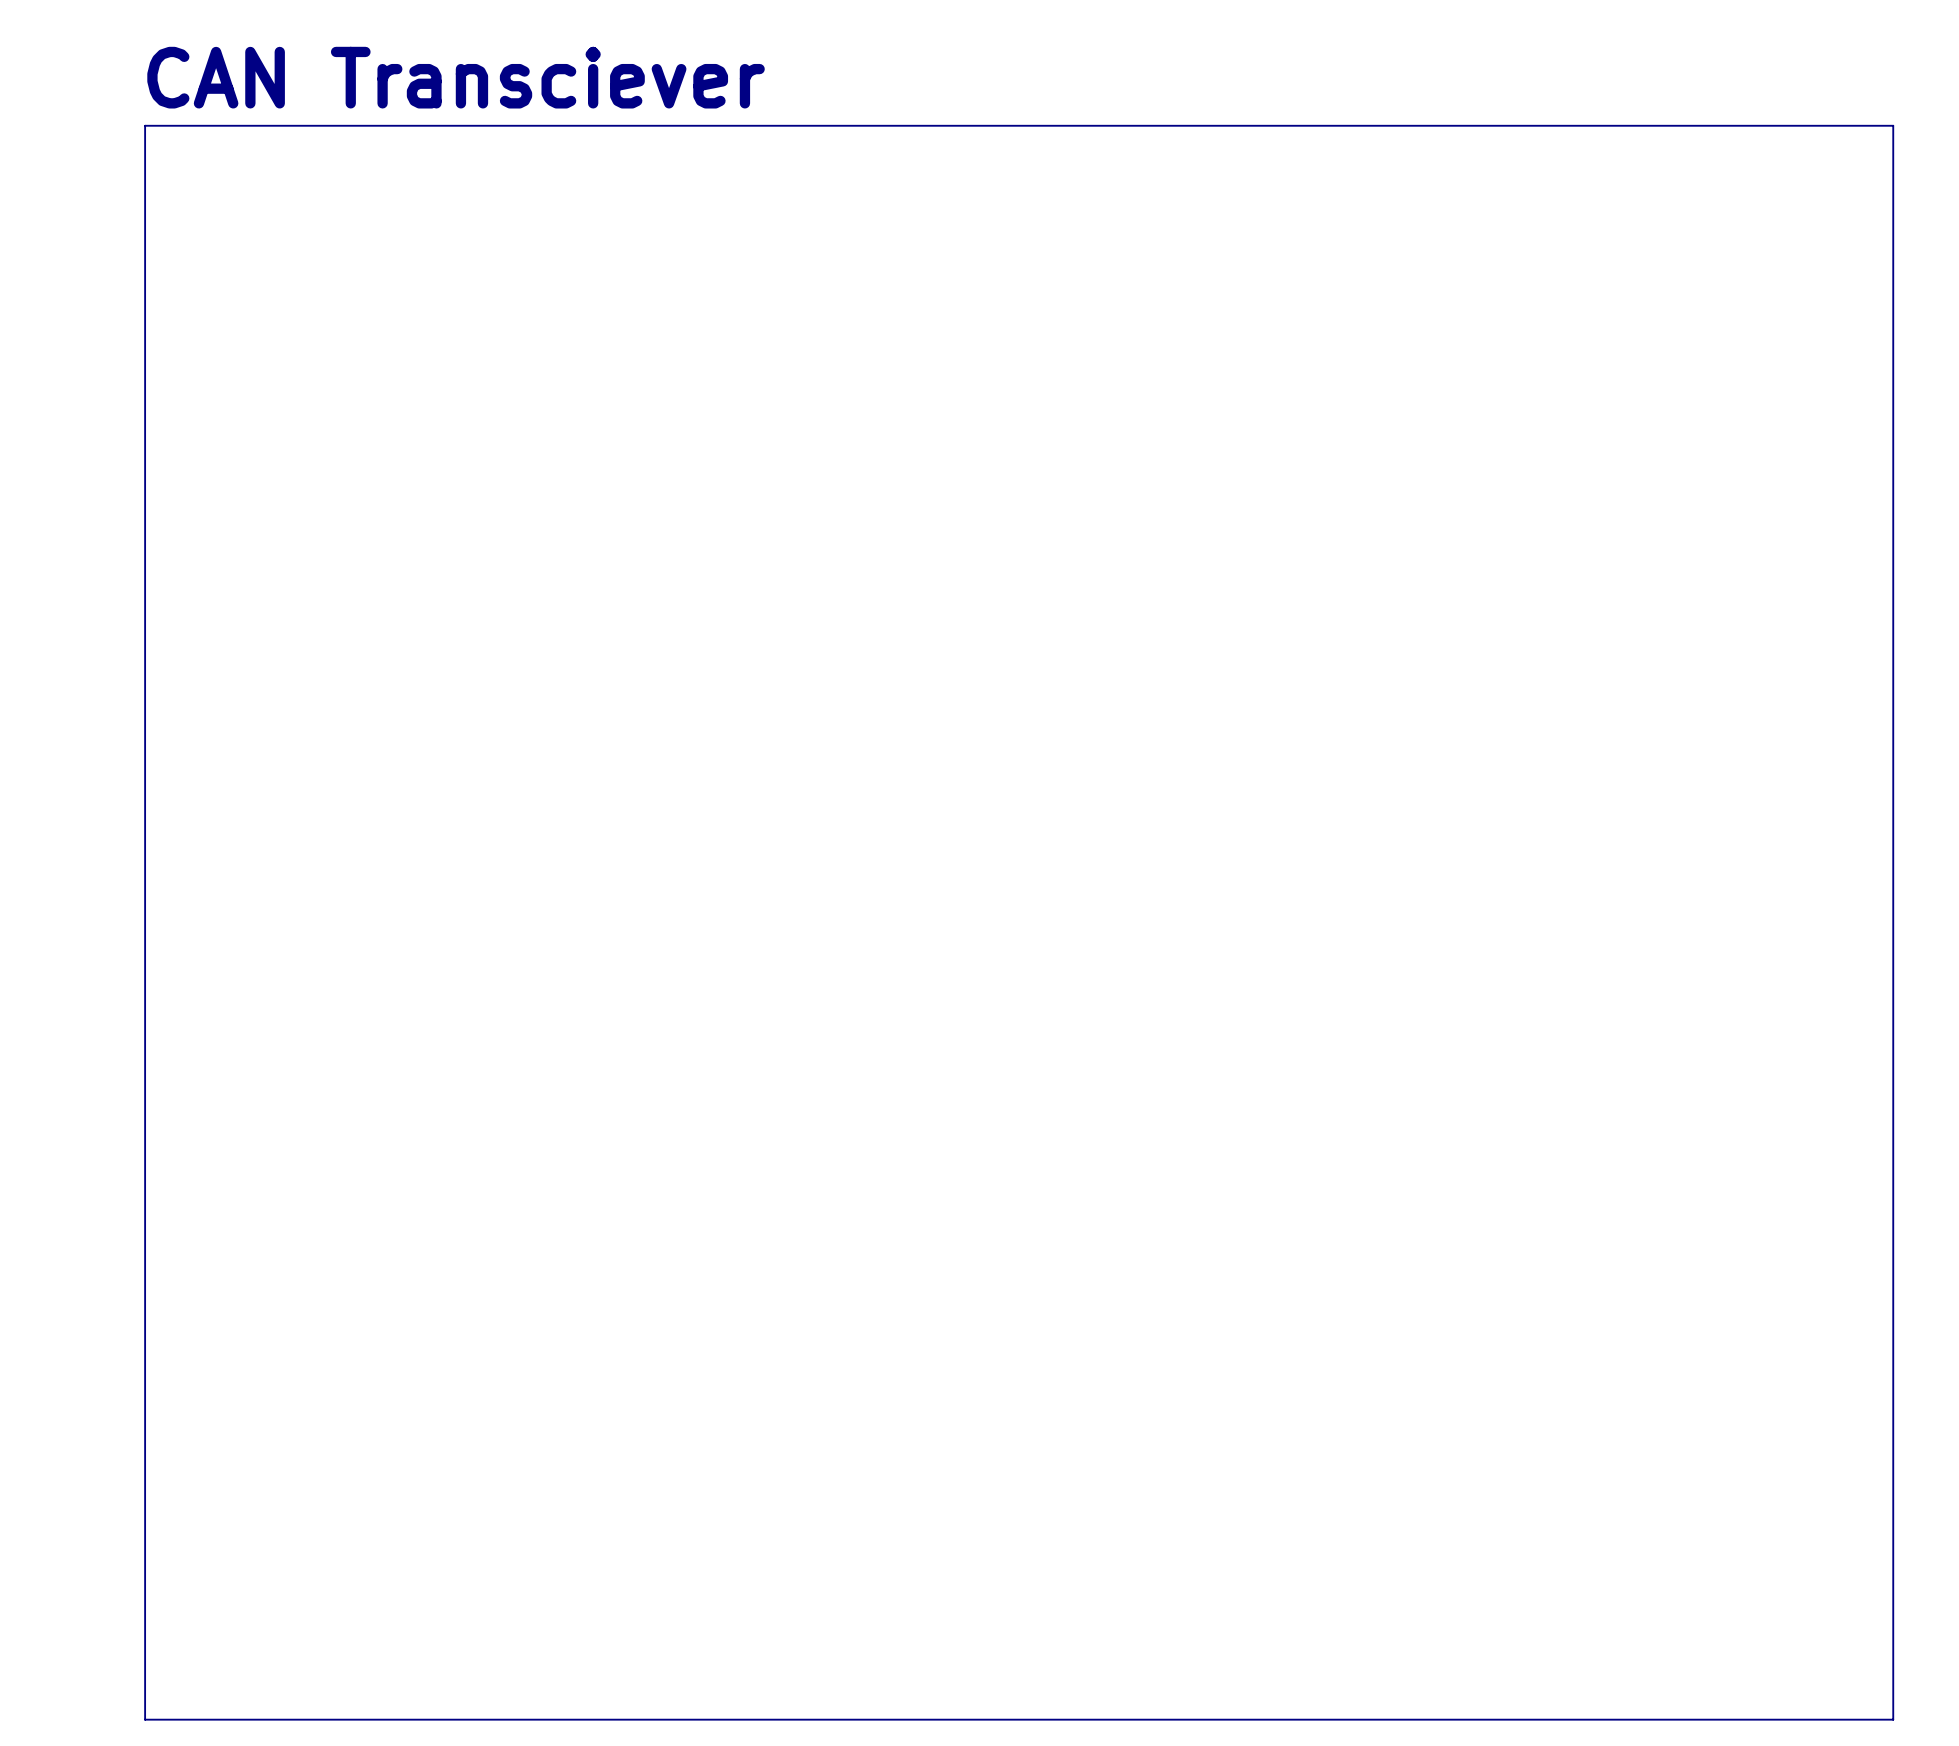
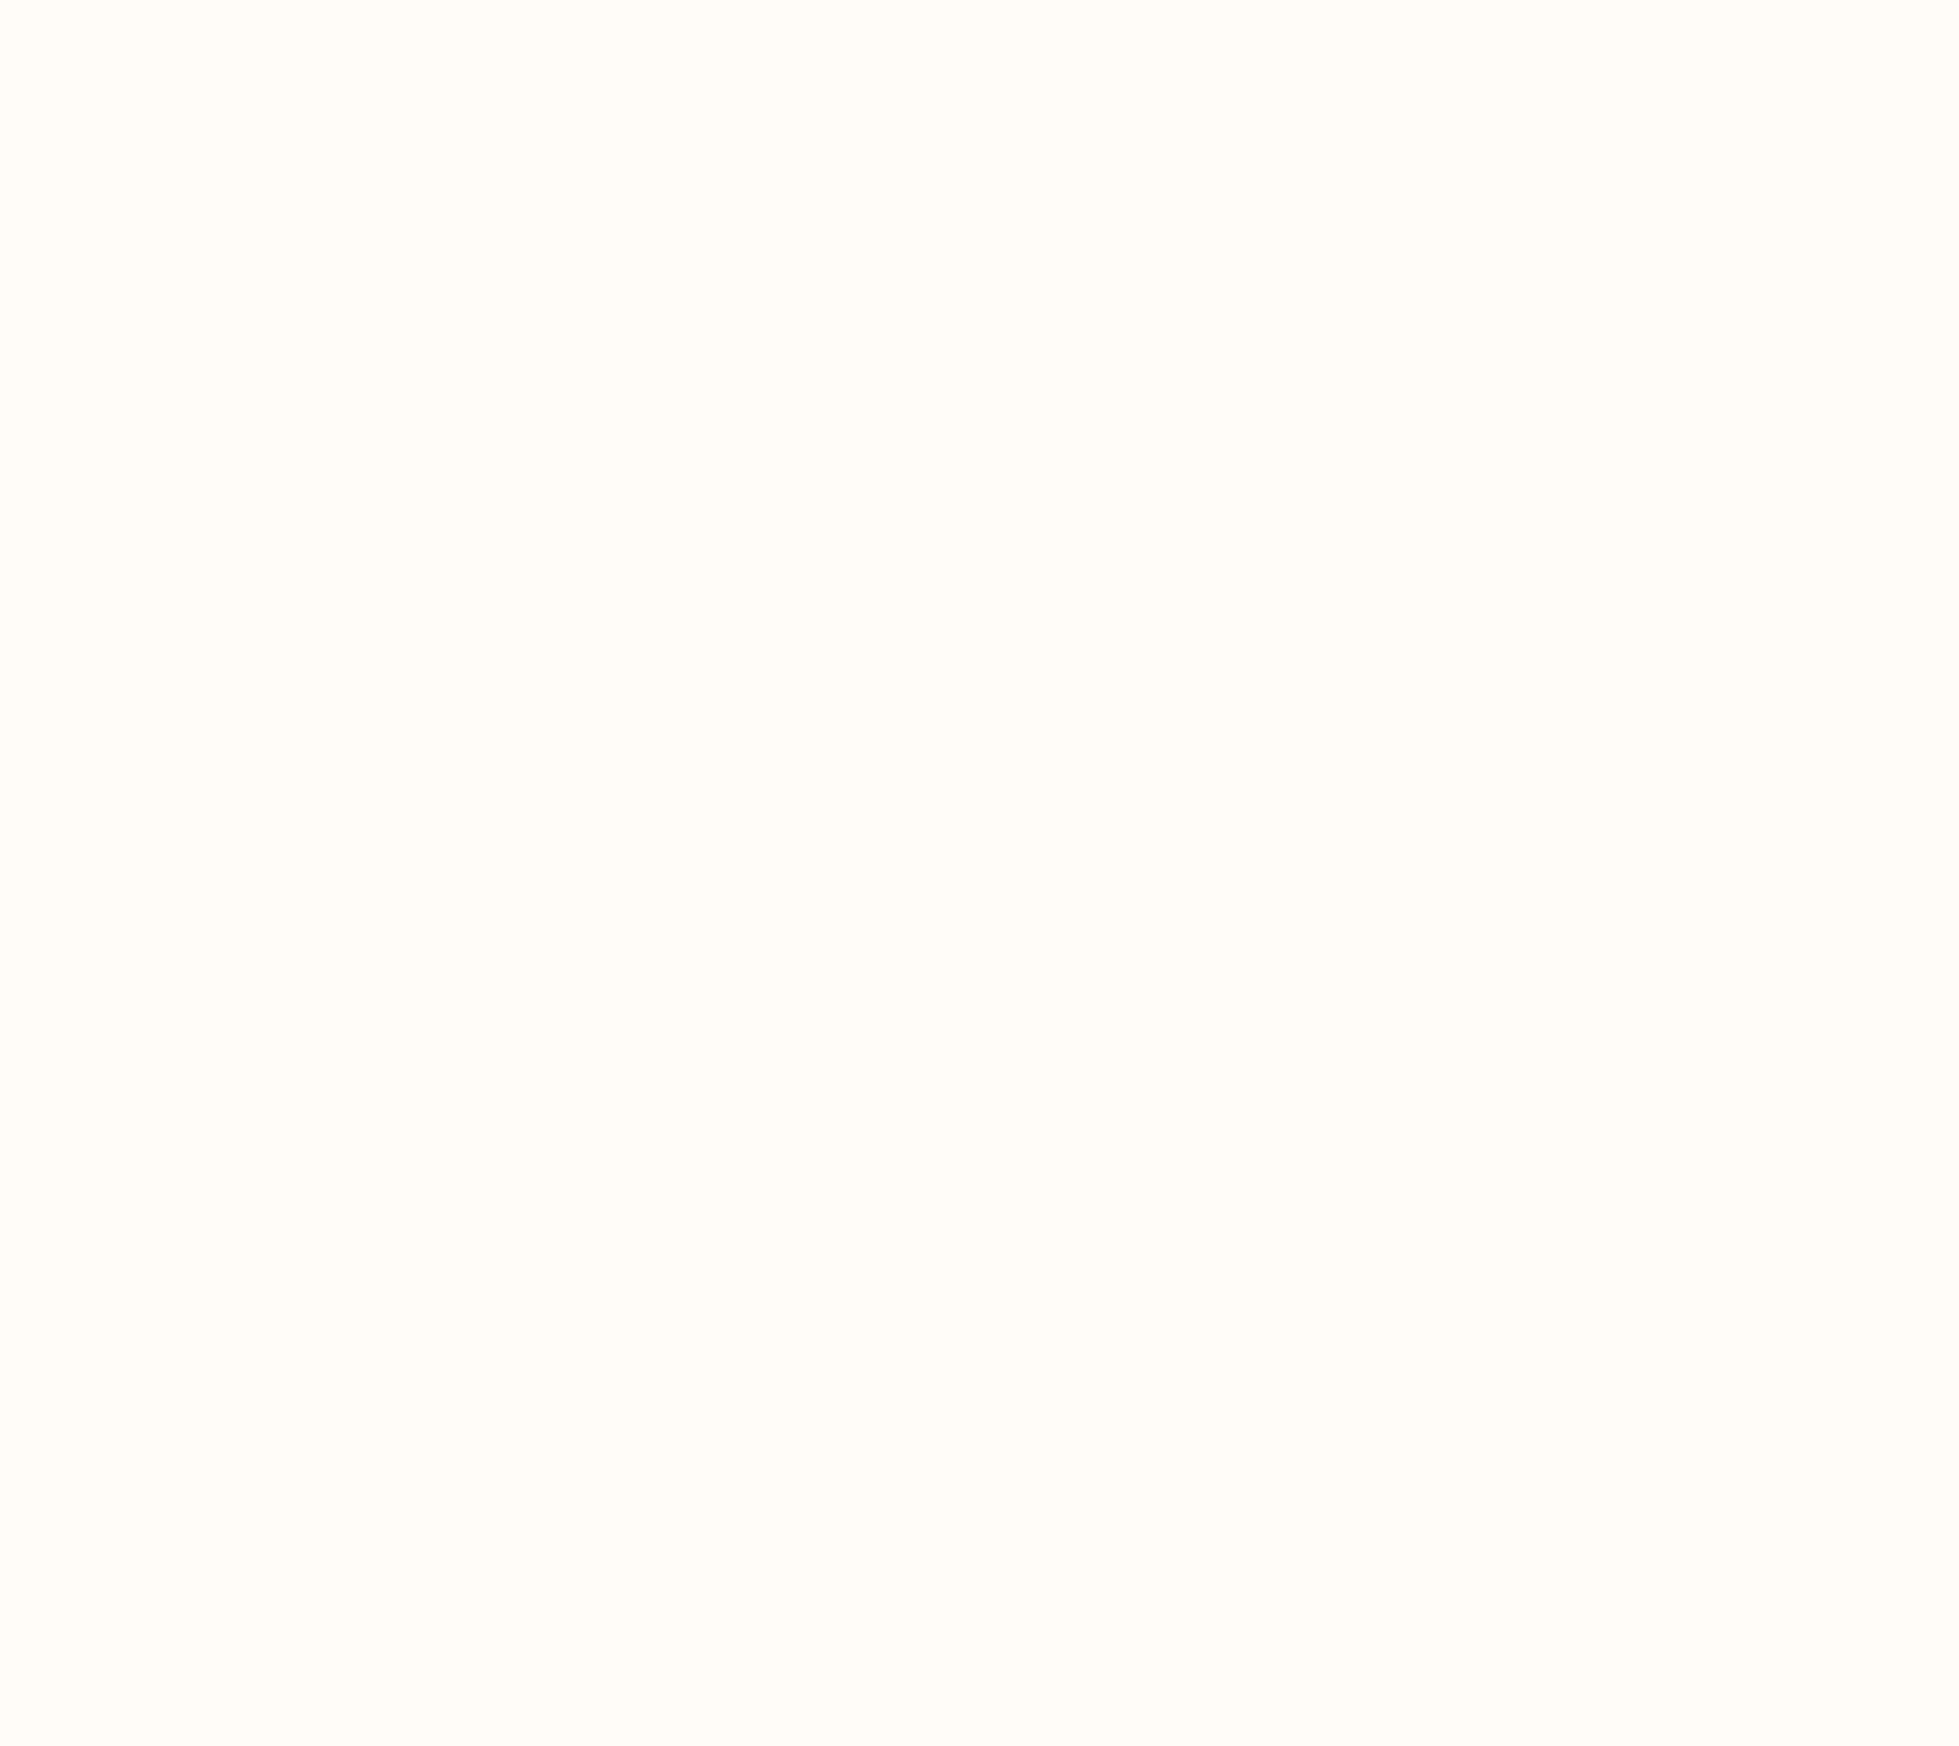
text: CAN Transciever (456, 77) -> none
line: (145, 125) (1893, 125) (1893, 1719) (145, 1719) (145, 125) -> none

